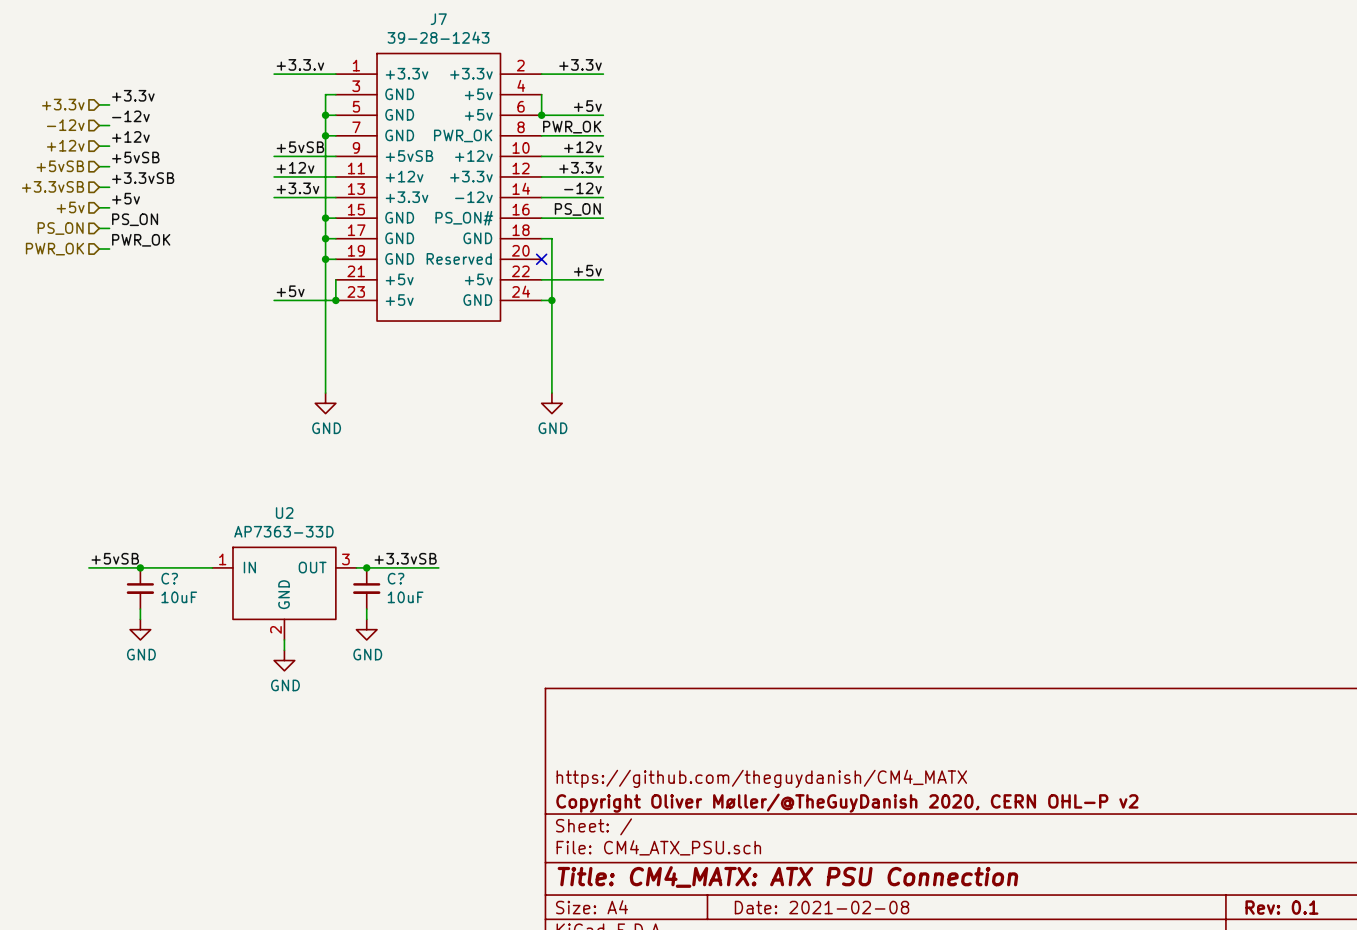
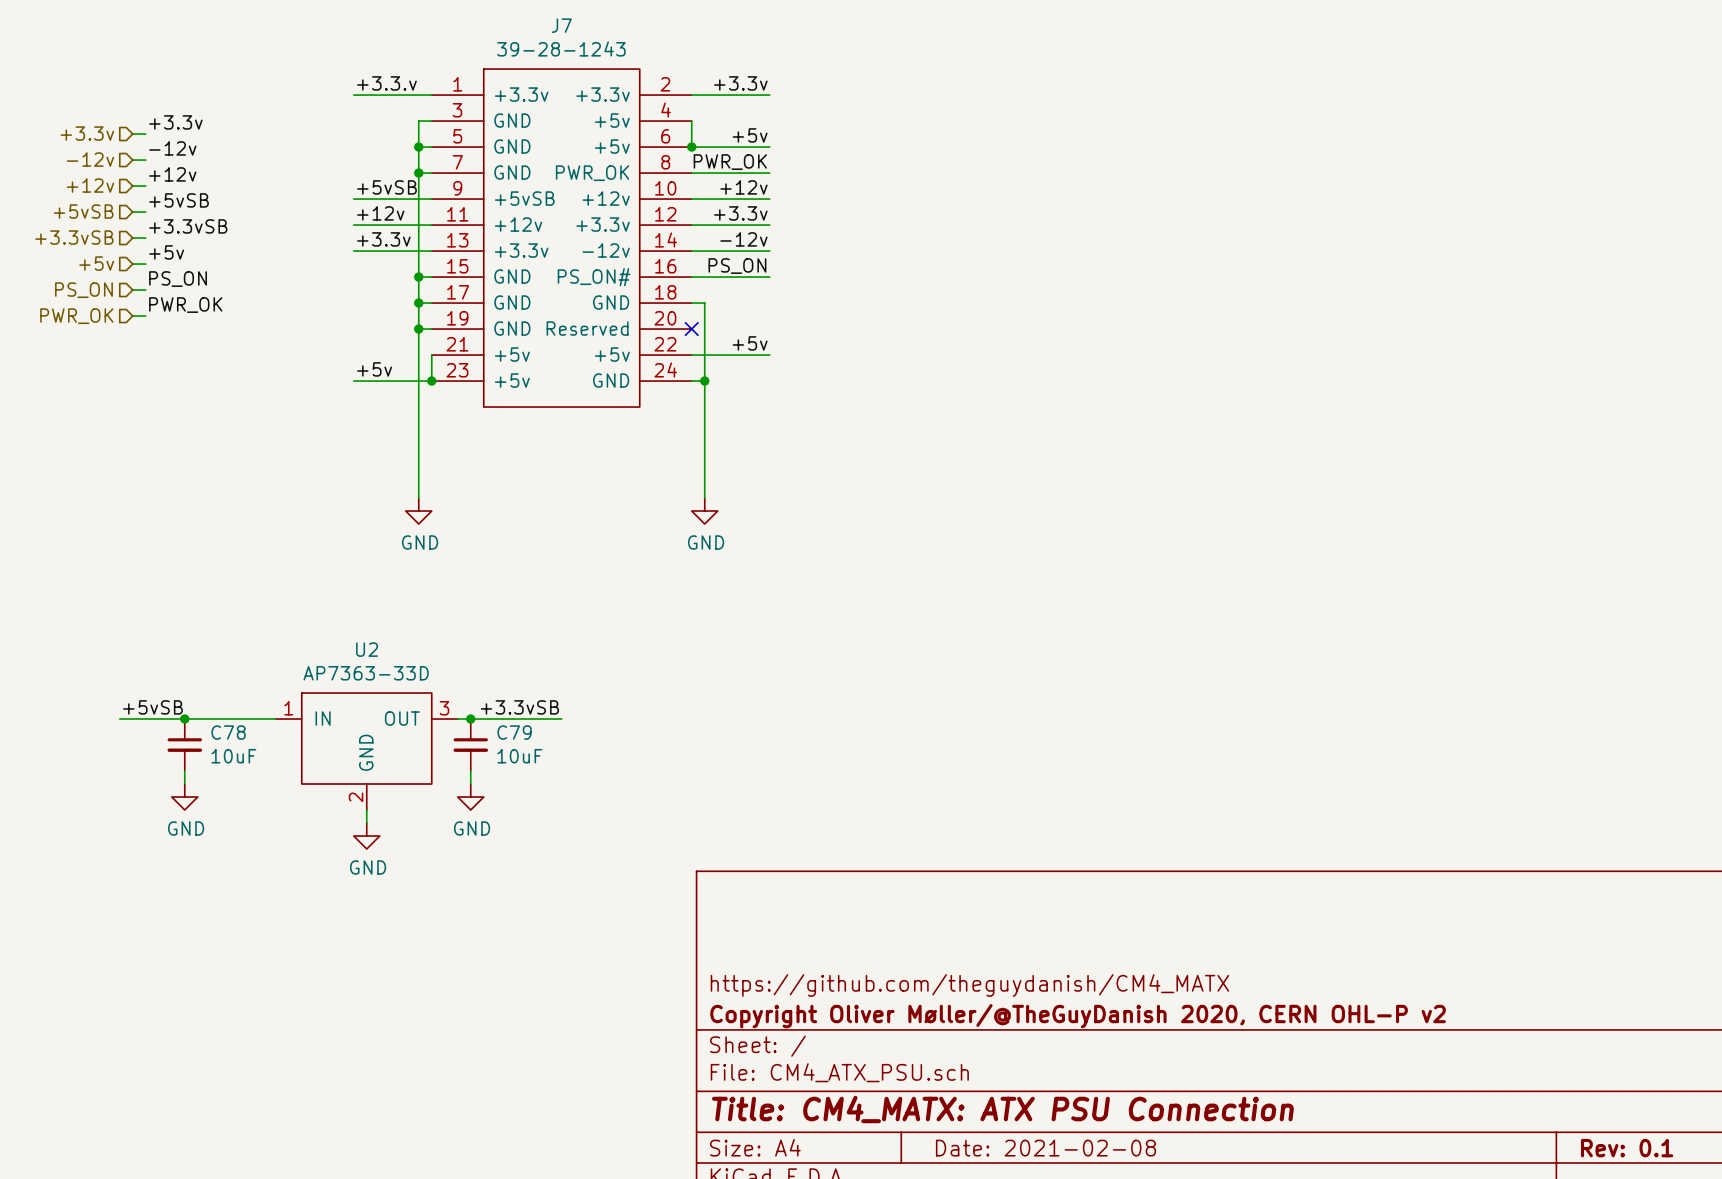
C? name: C? (169, 578) -> C78 (228, 732)
C? name: C? (396, 578) -> C79 (514, 732)

